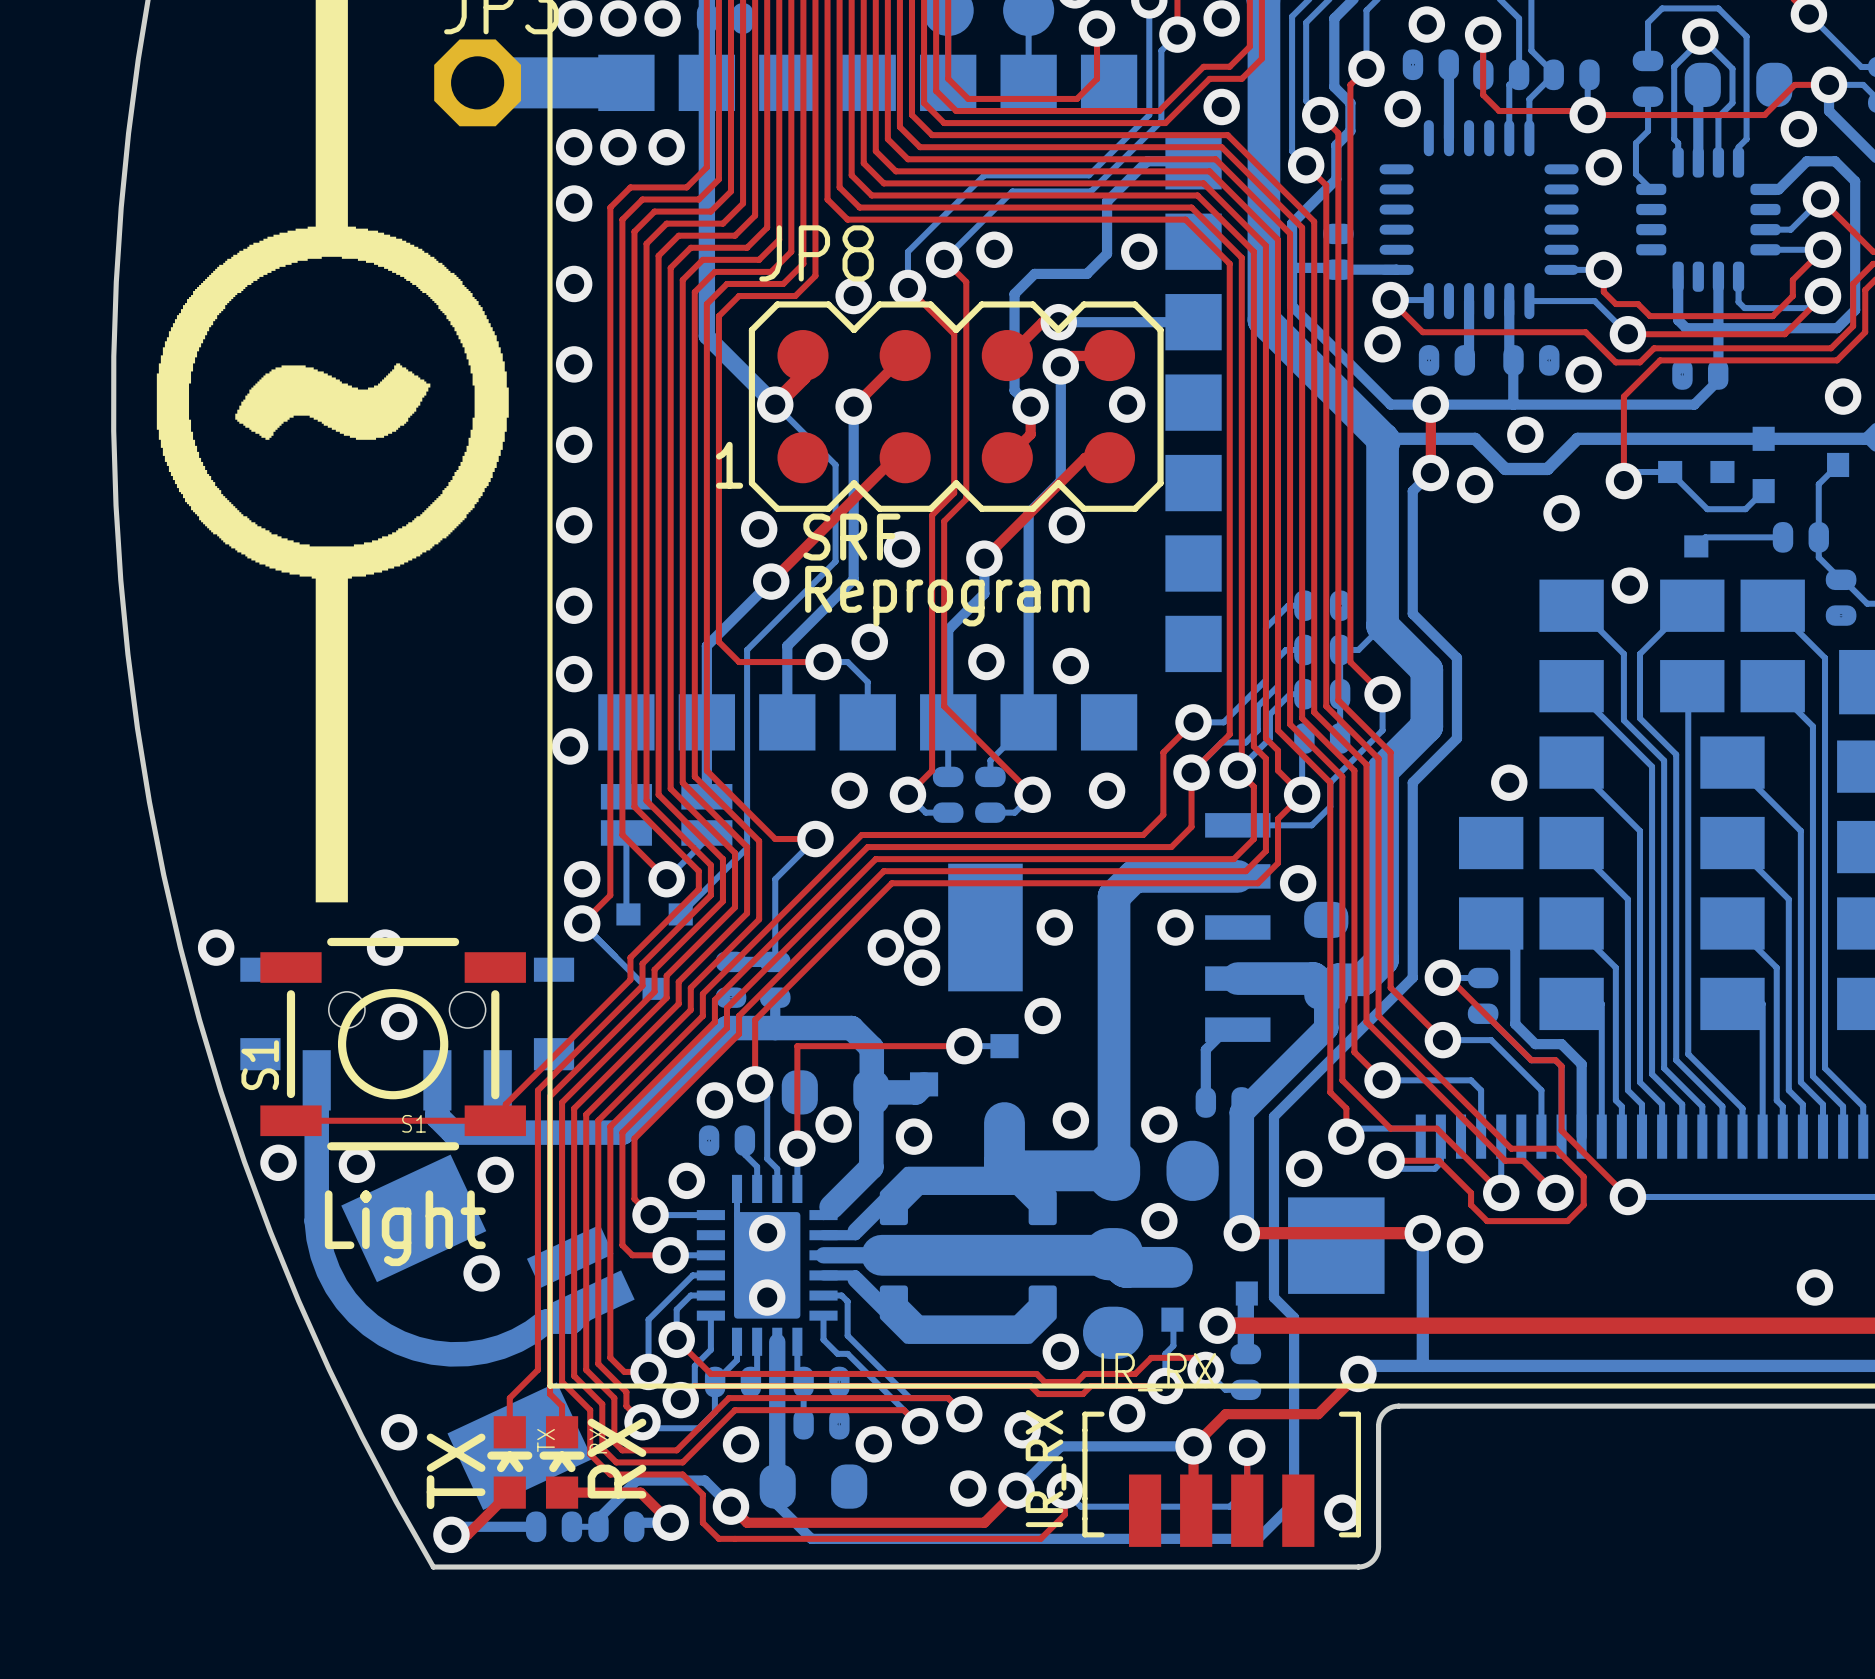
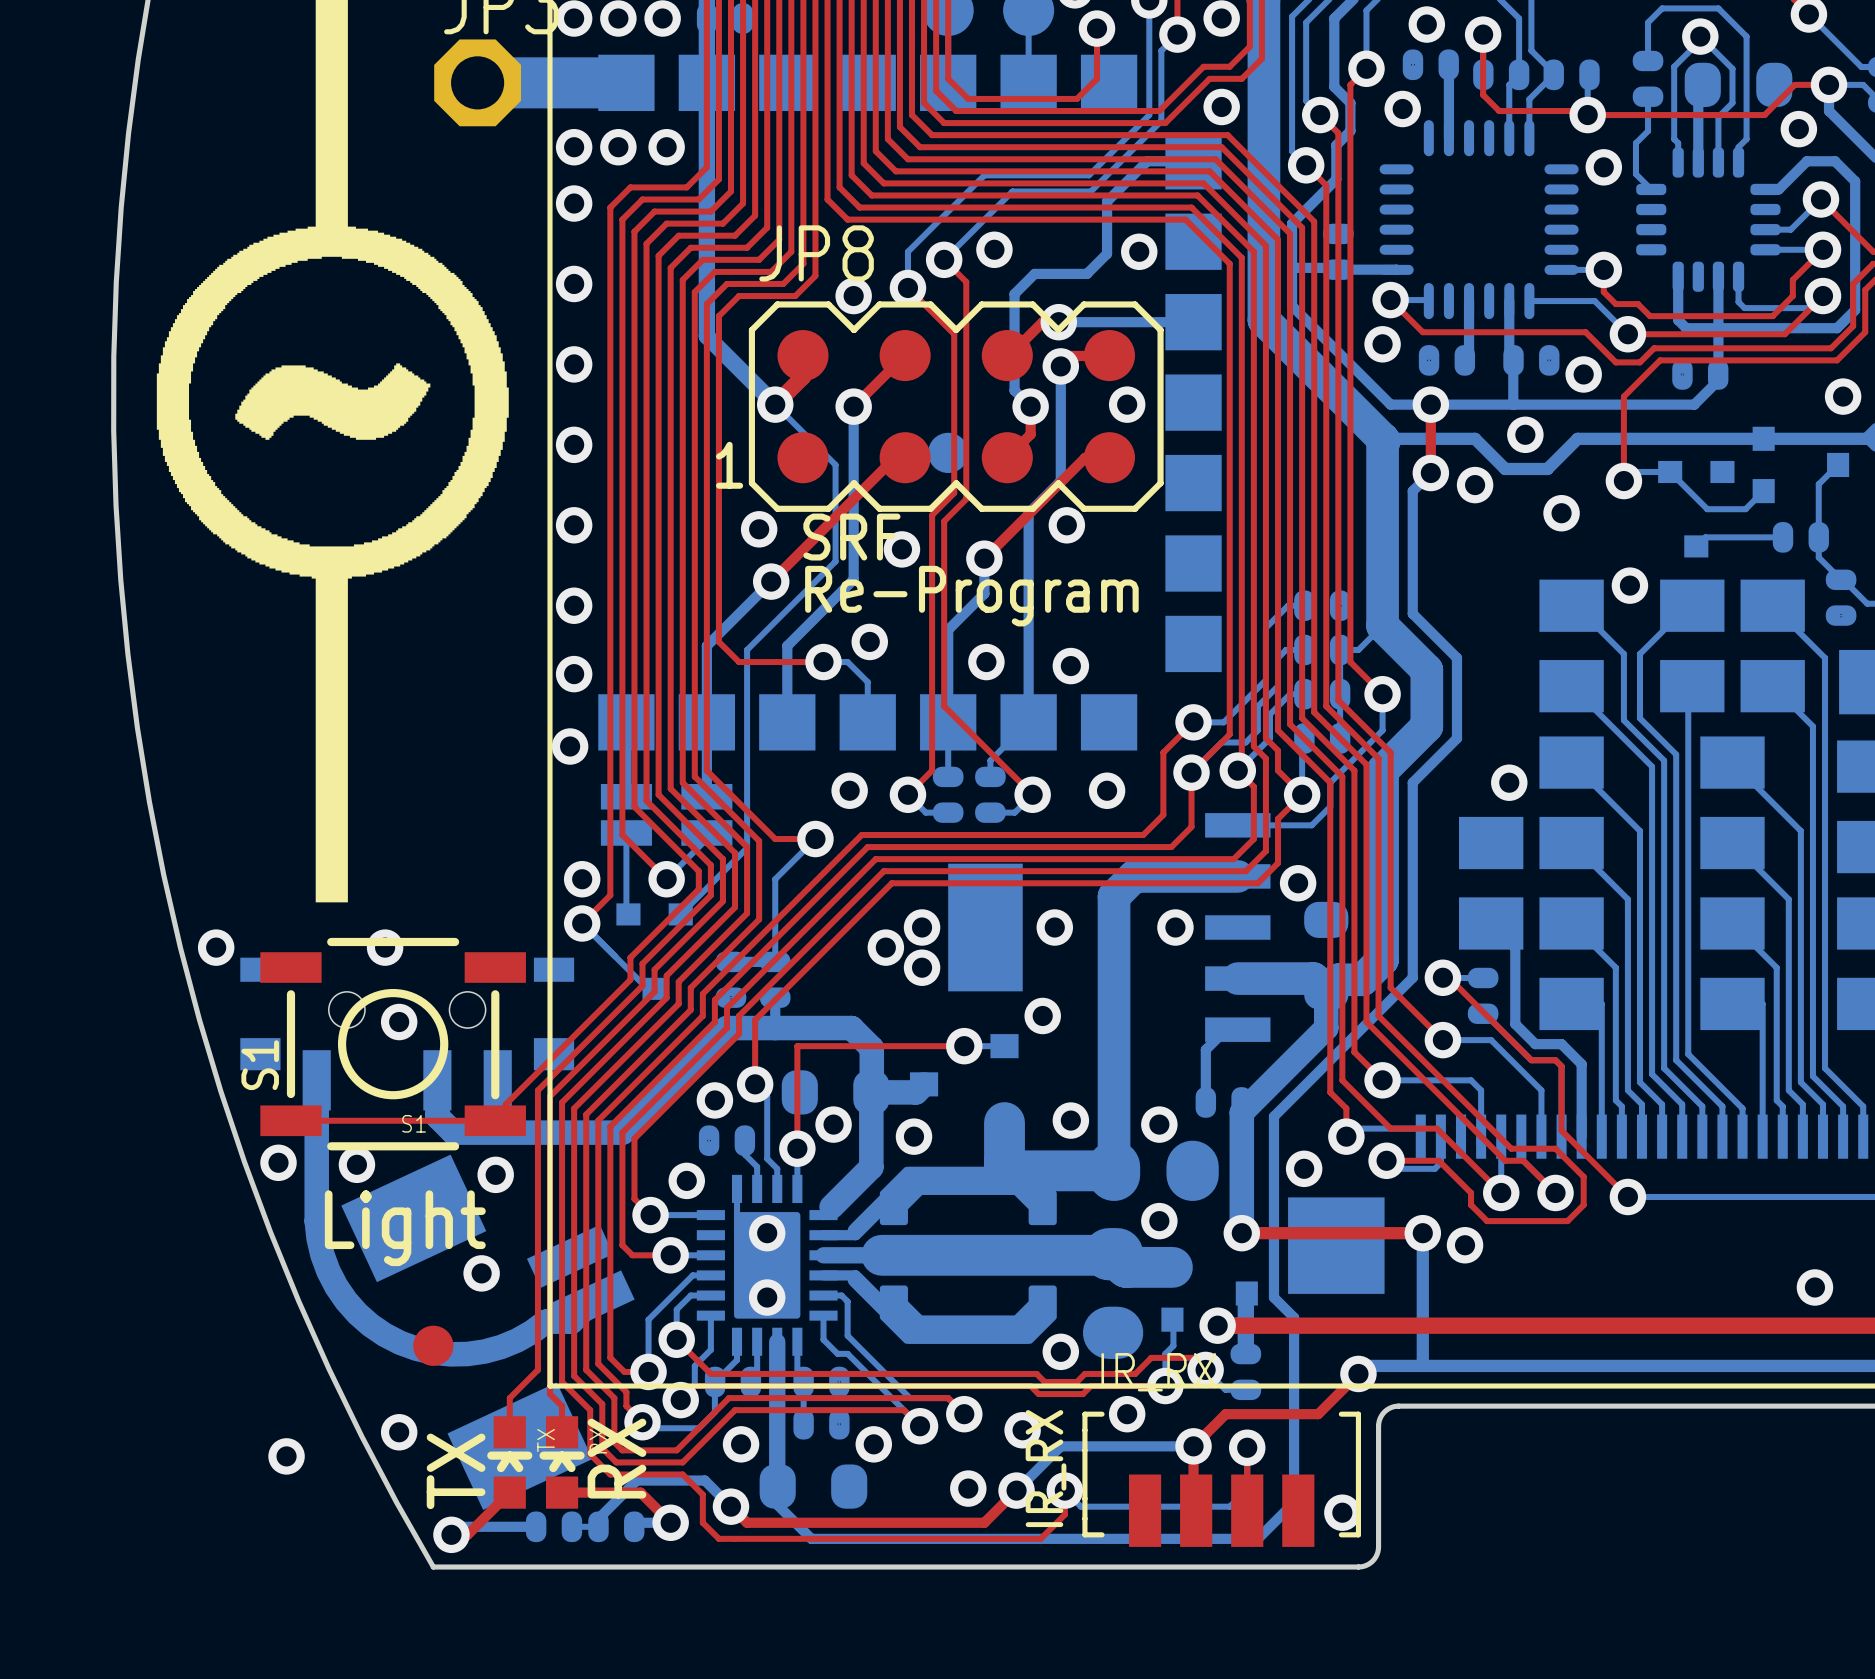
part: none -> (948, 452)
text: Reprogram (947, 596) -> Re-Program (971, 596)
part: none -> (433, 1345)
via: none -> (286, 1456)

